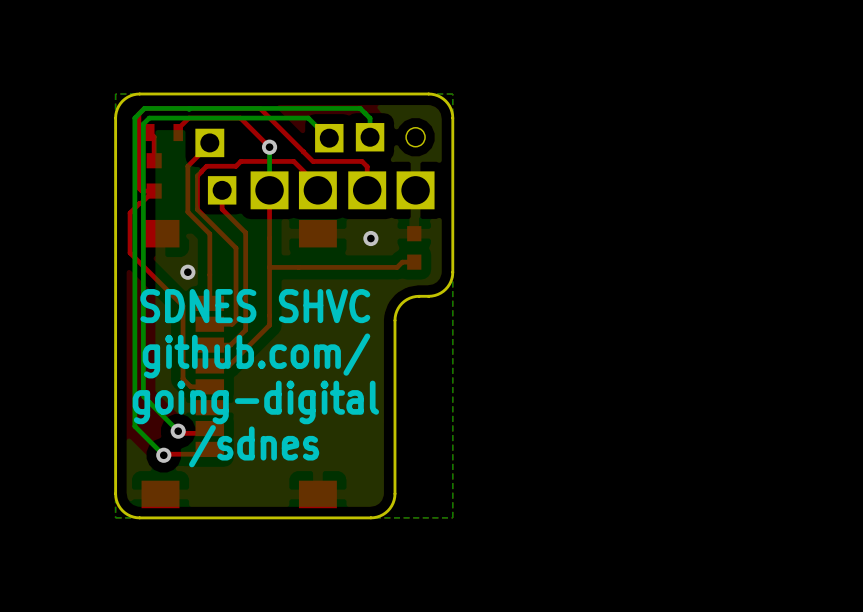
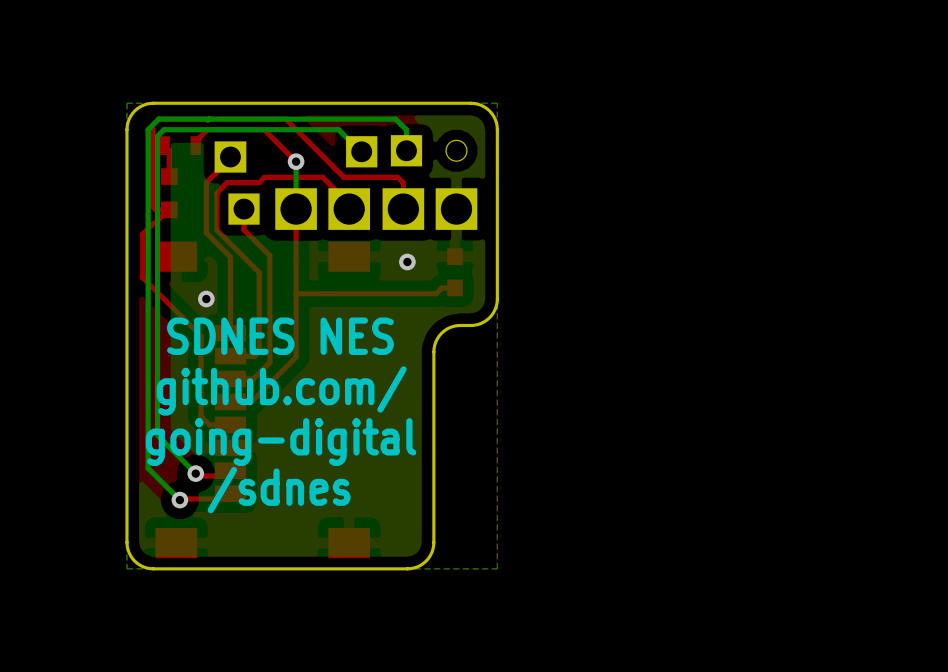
text: SDNES SHVC (255, 306) -> SDNES NES (280, 336)

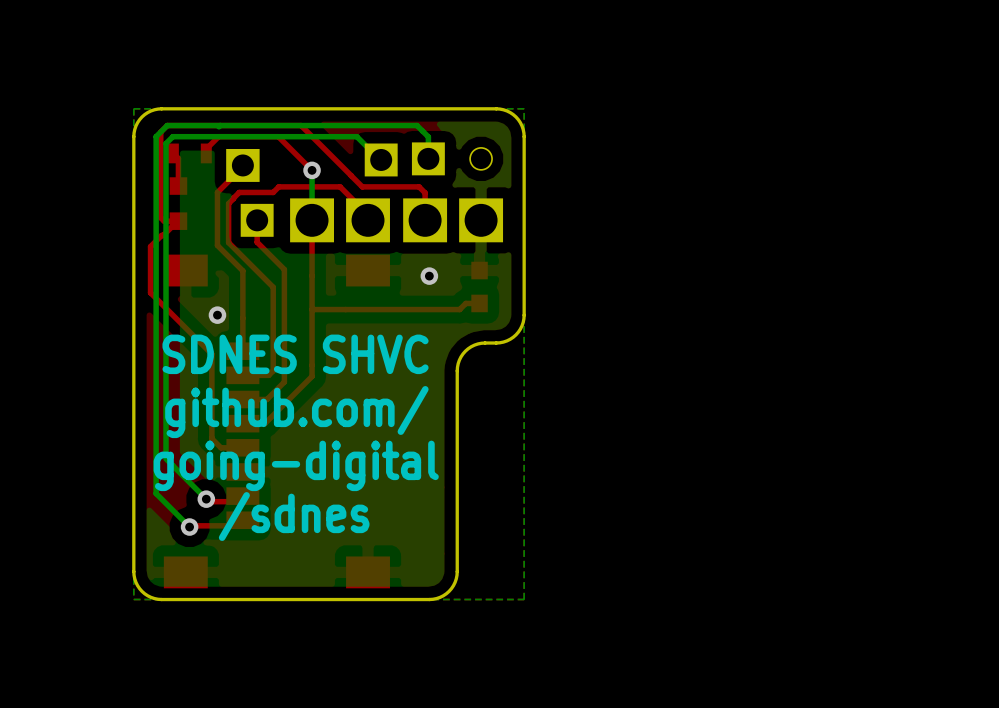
text: SDNES NES (280, 336) -> SDNES SHVC (295, 354)

